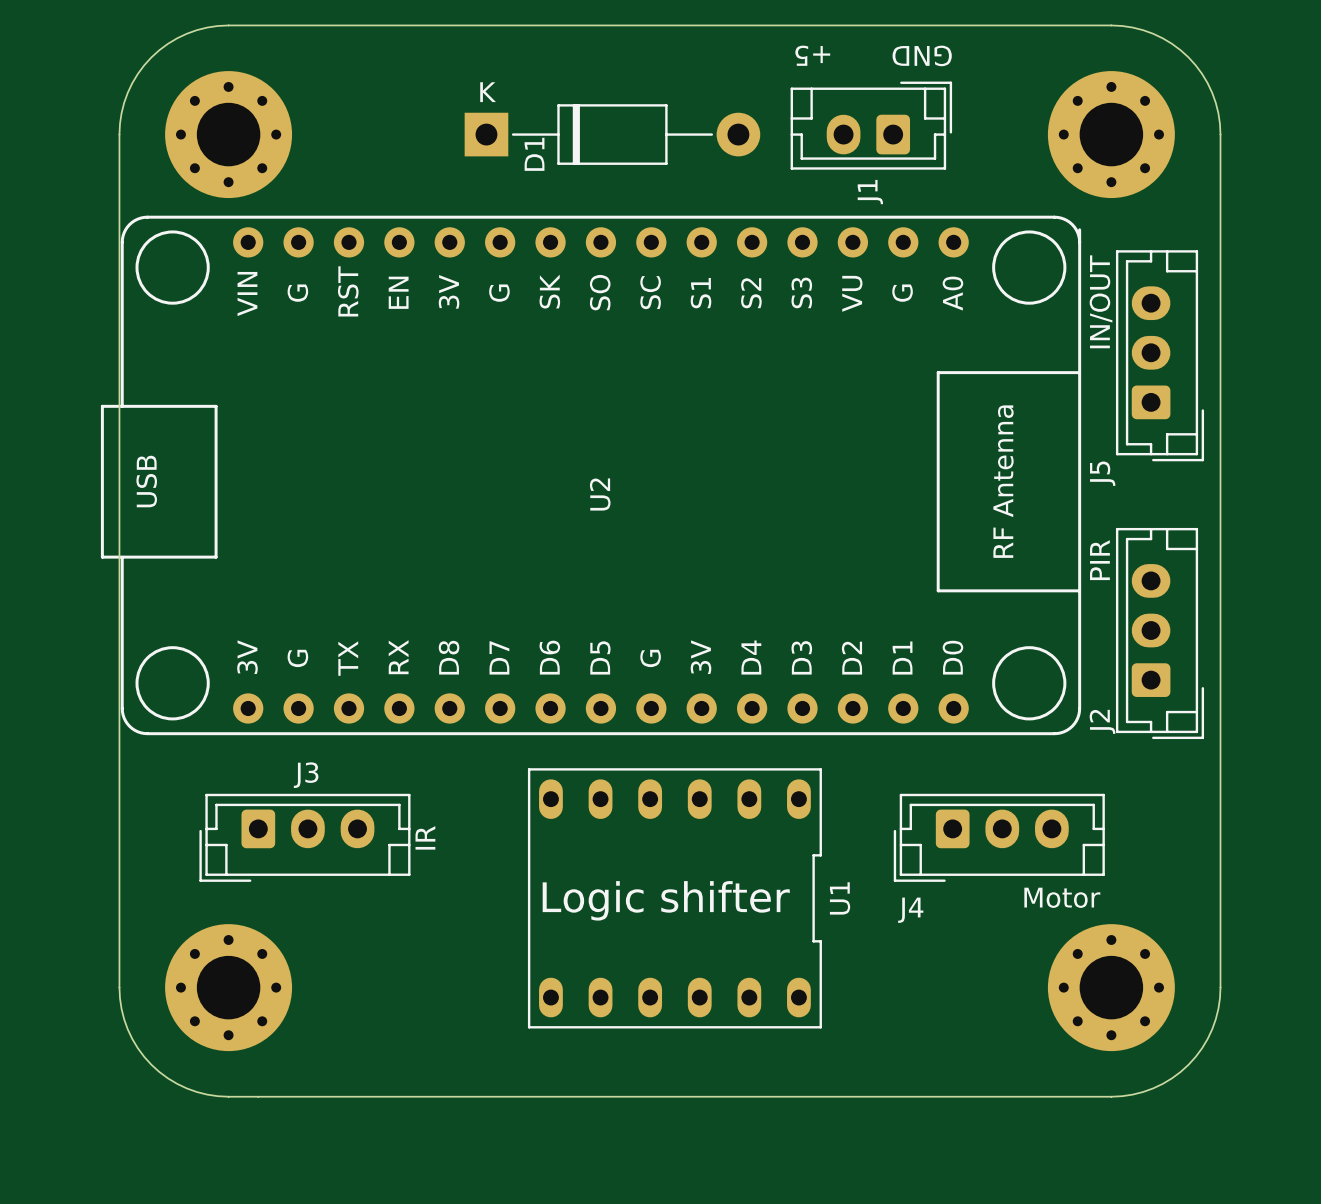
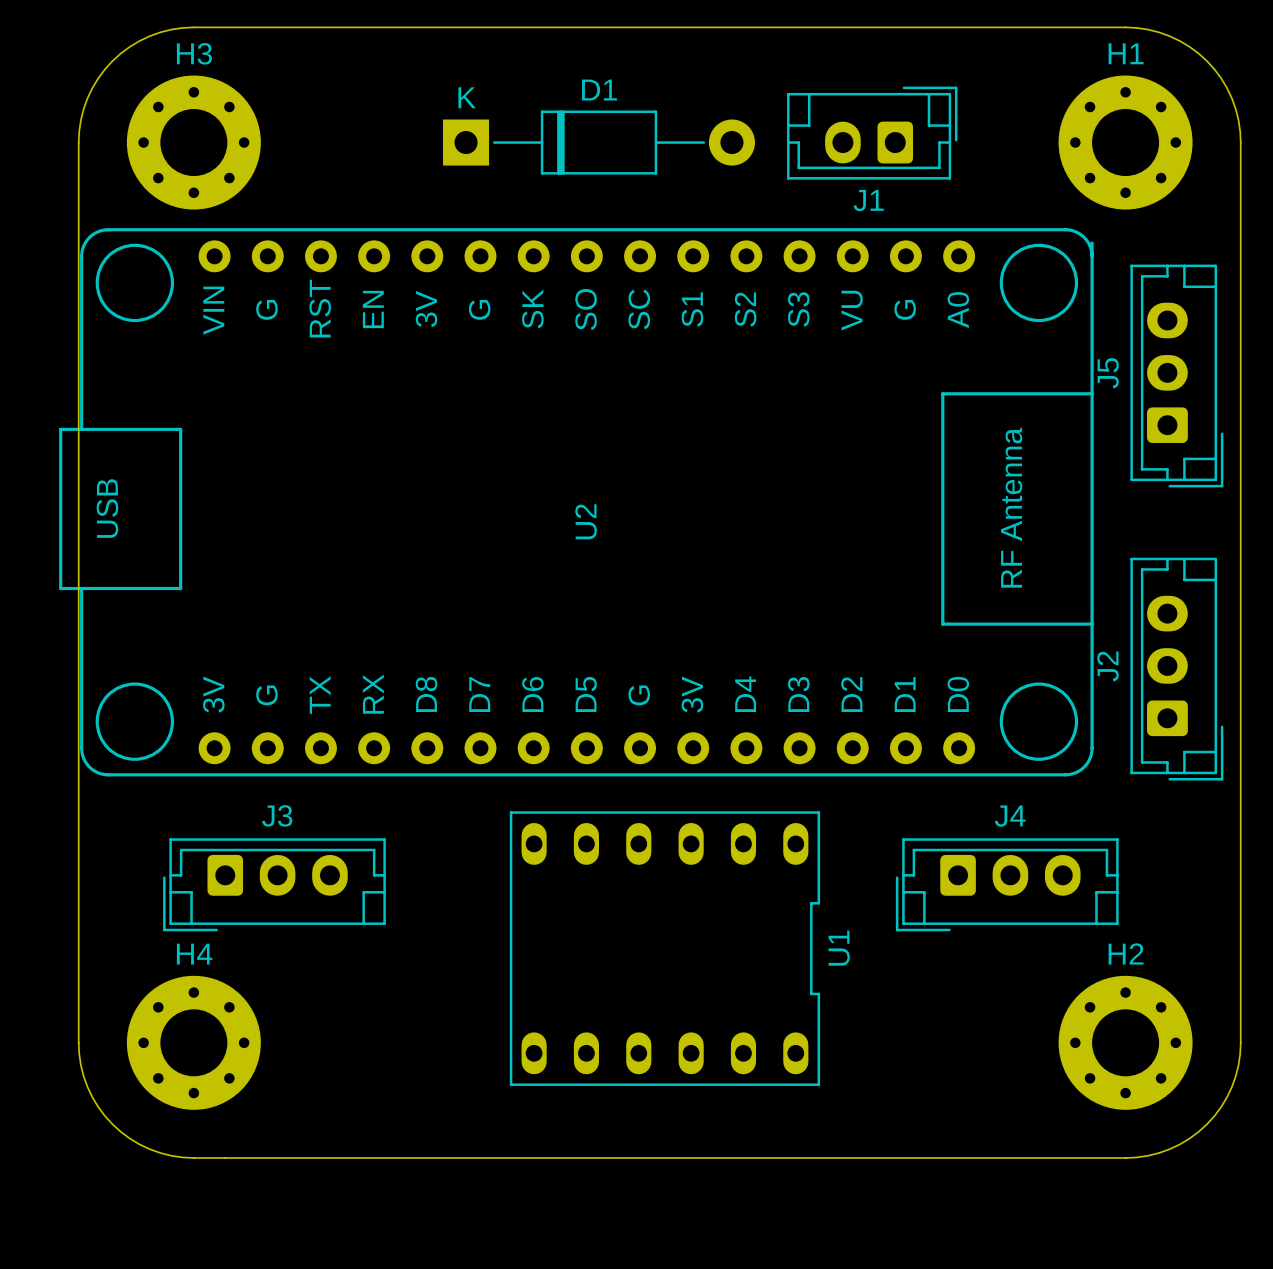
H3 name: none -> H3 (194, 53)
H1 name: none -> H1 (1126, 53)
text: +5 (812, 55) -> none
text: GND (922, 55) -> none
D1 name rotation: 0° (534, 154) -> 90° clockwise (599, 90)
D1 name position: D1 (534, 154) -> D1 (599, 90)
J1 name rotation: 0° (870, 192) -> 90° clockwise (868, 200)
text: IN/OUT (1101, 301) -> none
J5 name position: J5 (1102, 473) -> J5 (1108, 373)
text: PIR (1099, 560) -> none
J2 name position: J2 (1102, 721) -> J2 (1108, 666)
text: IR (425, 837) -> none
text: Motor (1062, 897) -> none
text: Logic shifter (666, 900) -> none
H4 name: none -> H4 (194, 954)
H2 name: none -> H2 (1126, 953)
J4 name position: J4 (910, 910) -> J4 (1010, 816)

